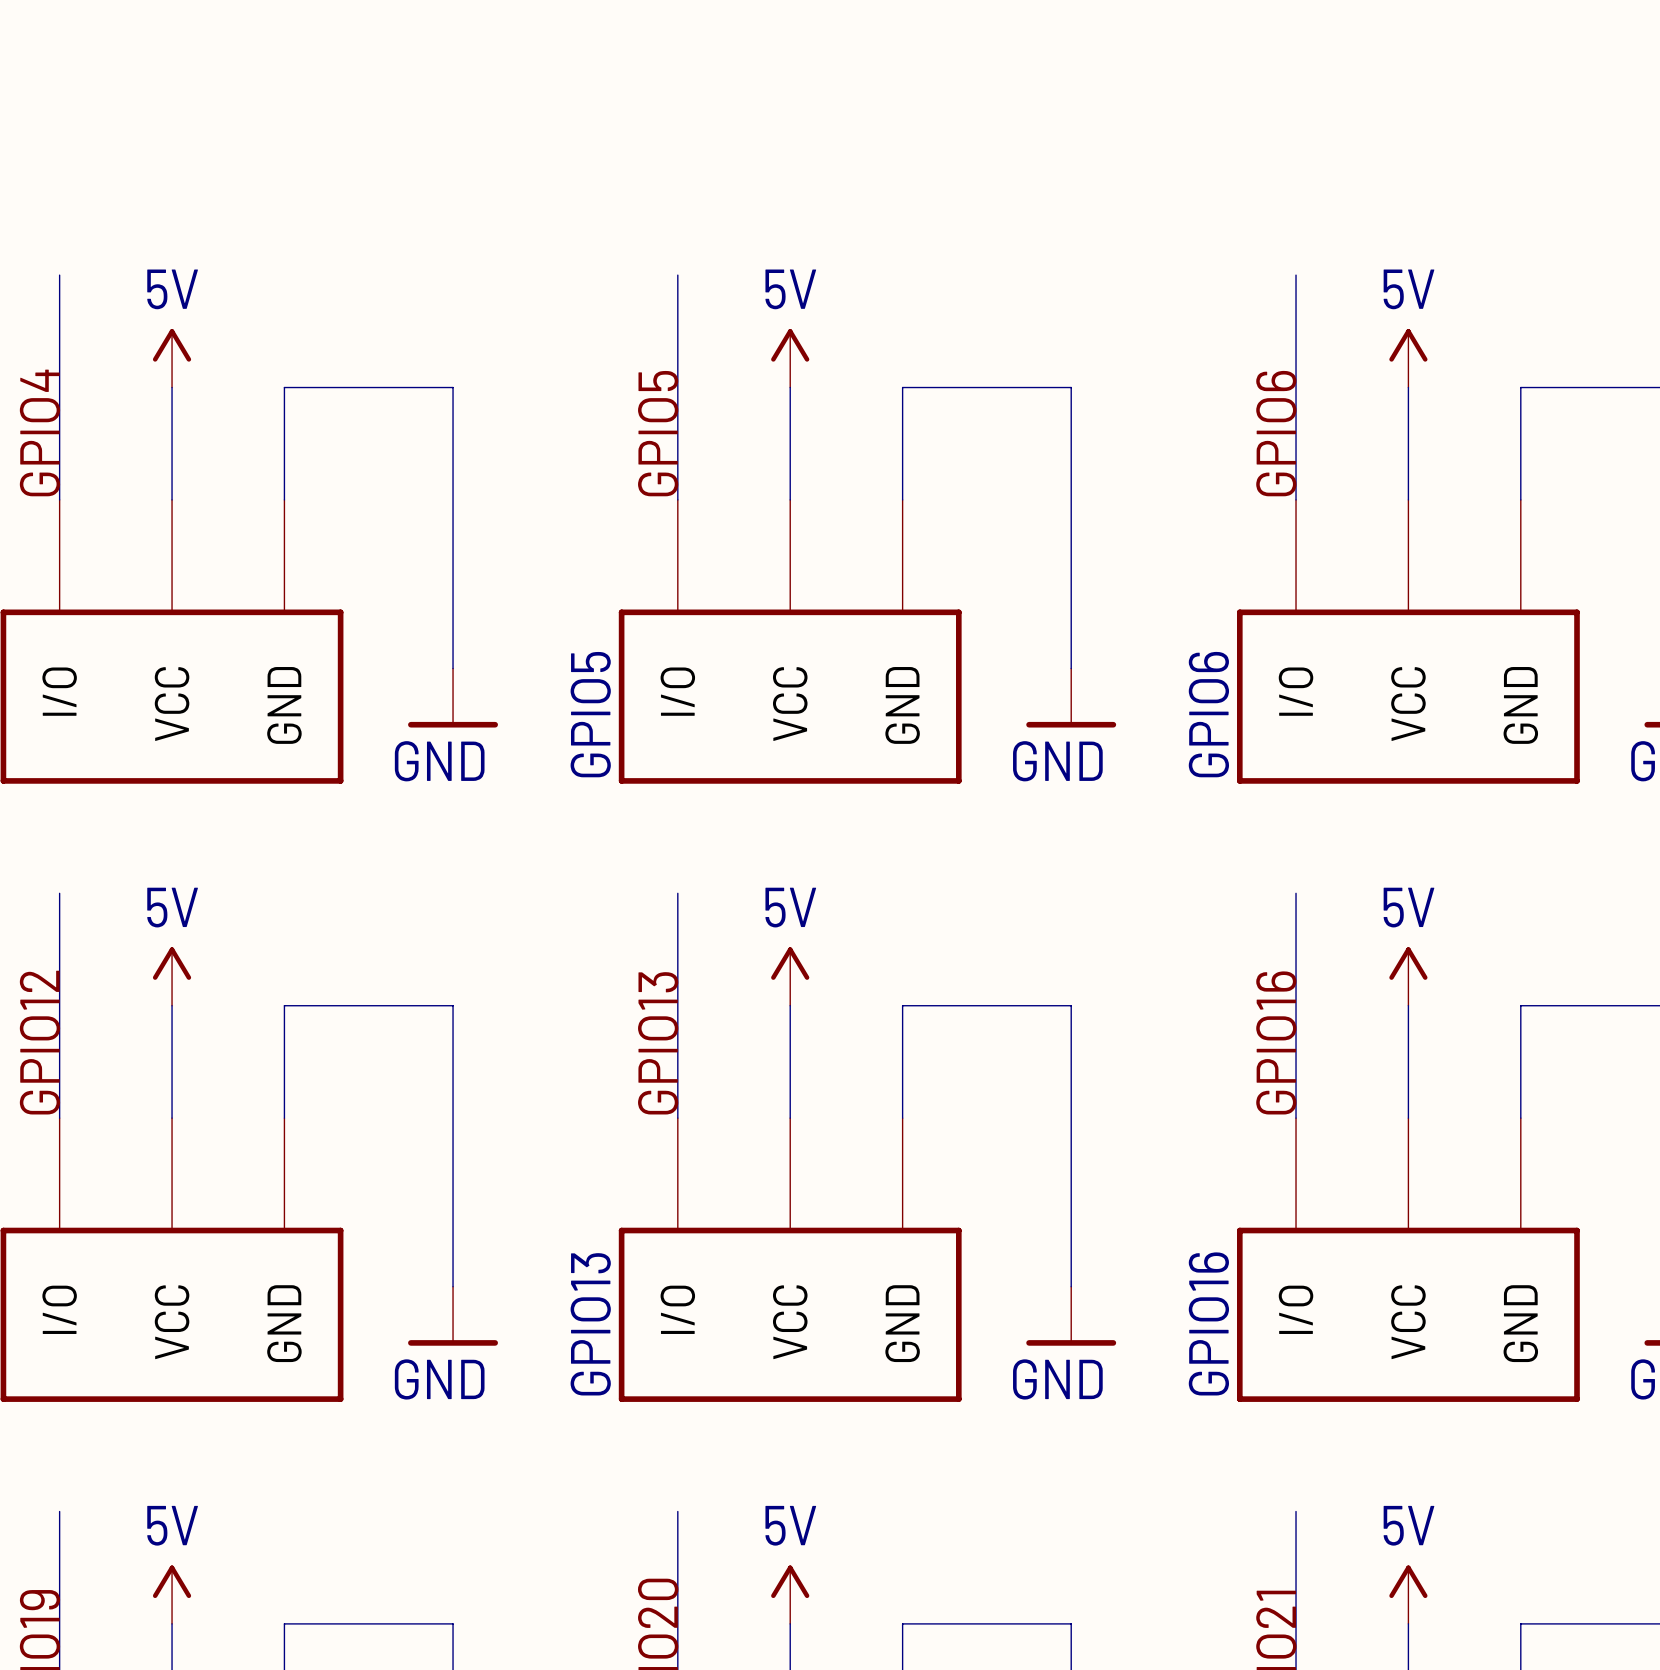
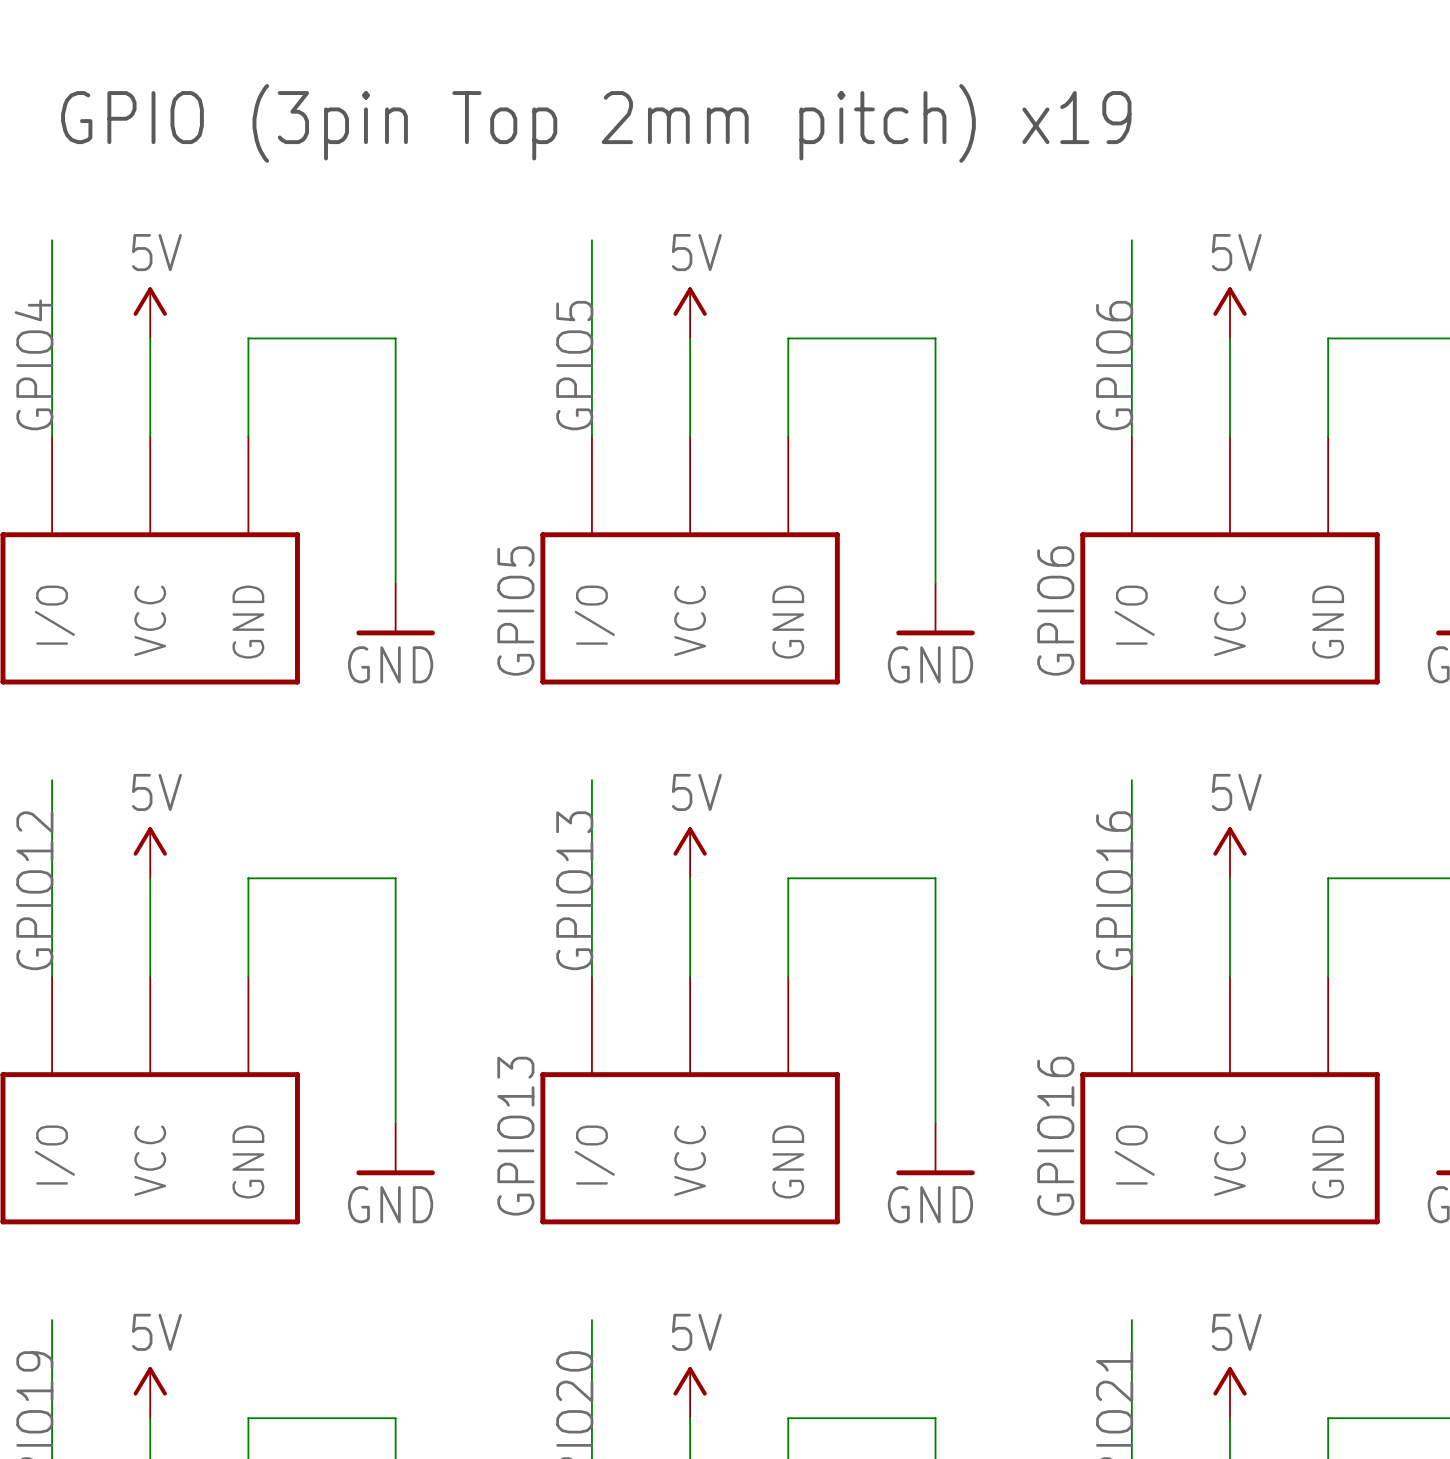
text: none -> GPIO (3pin Top 2mm pitch) x19 (596, 123)

